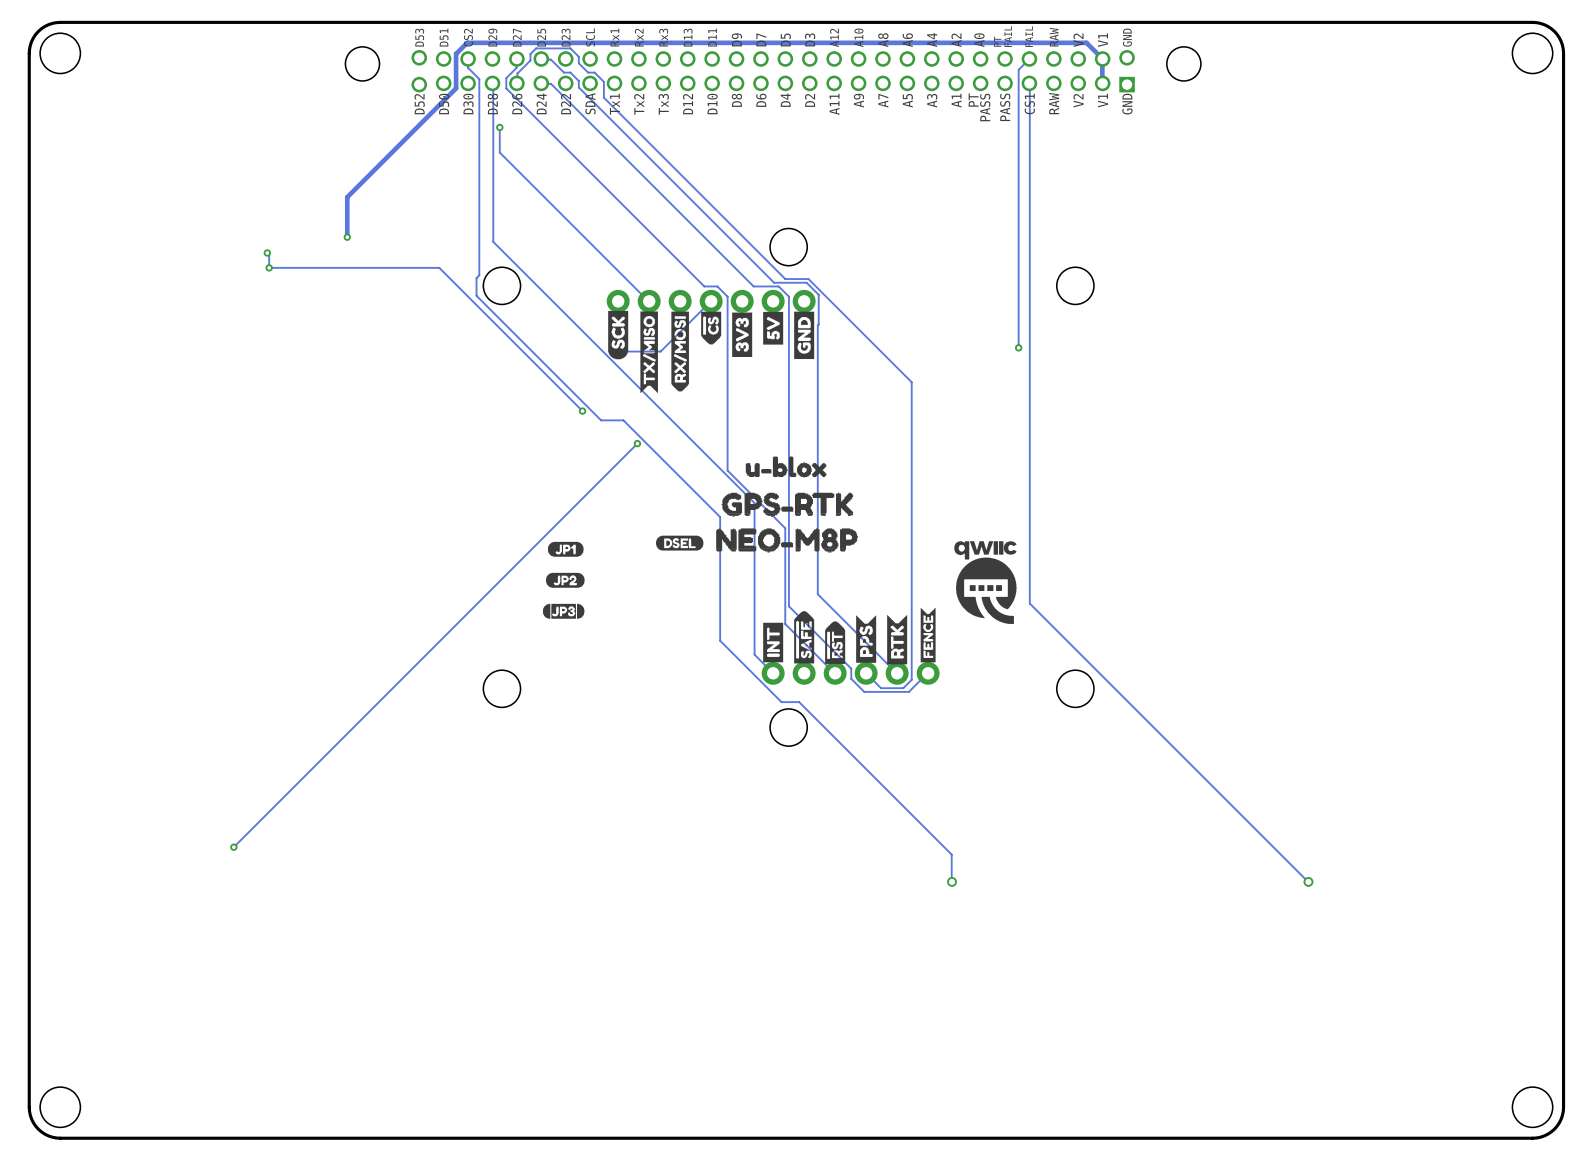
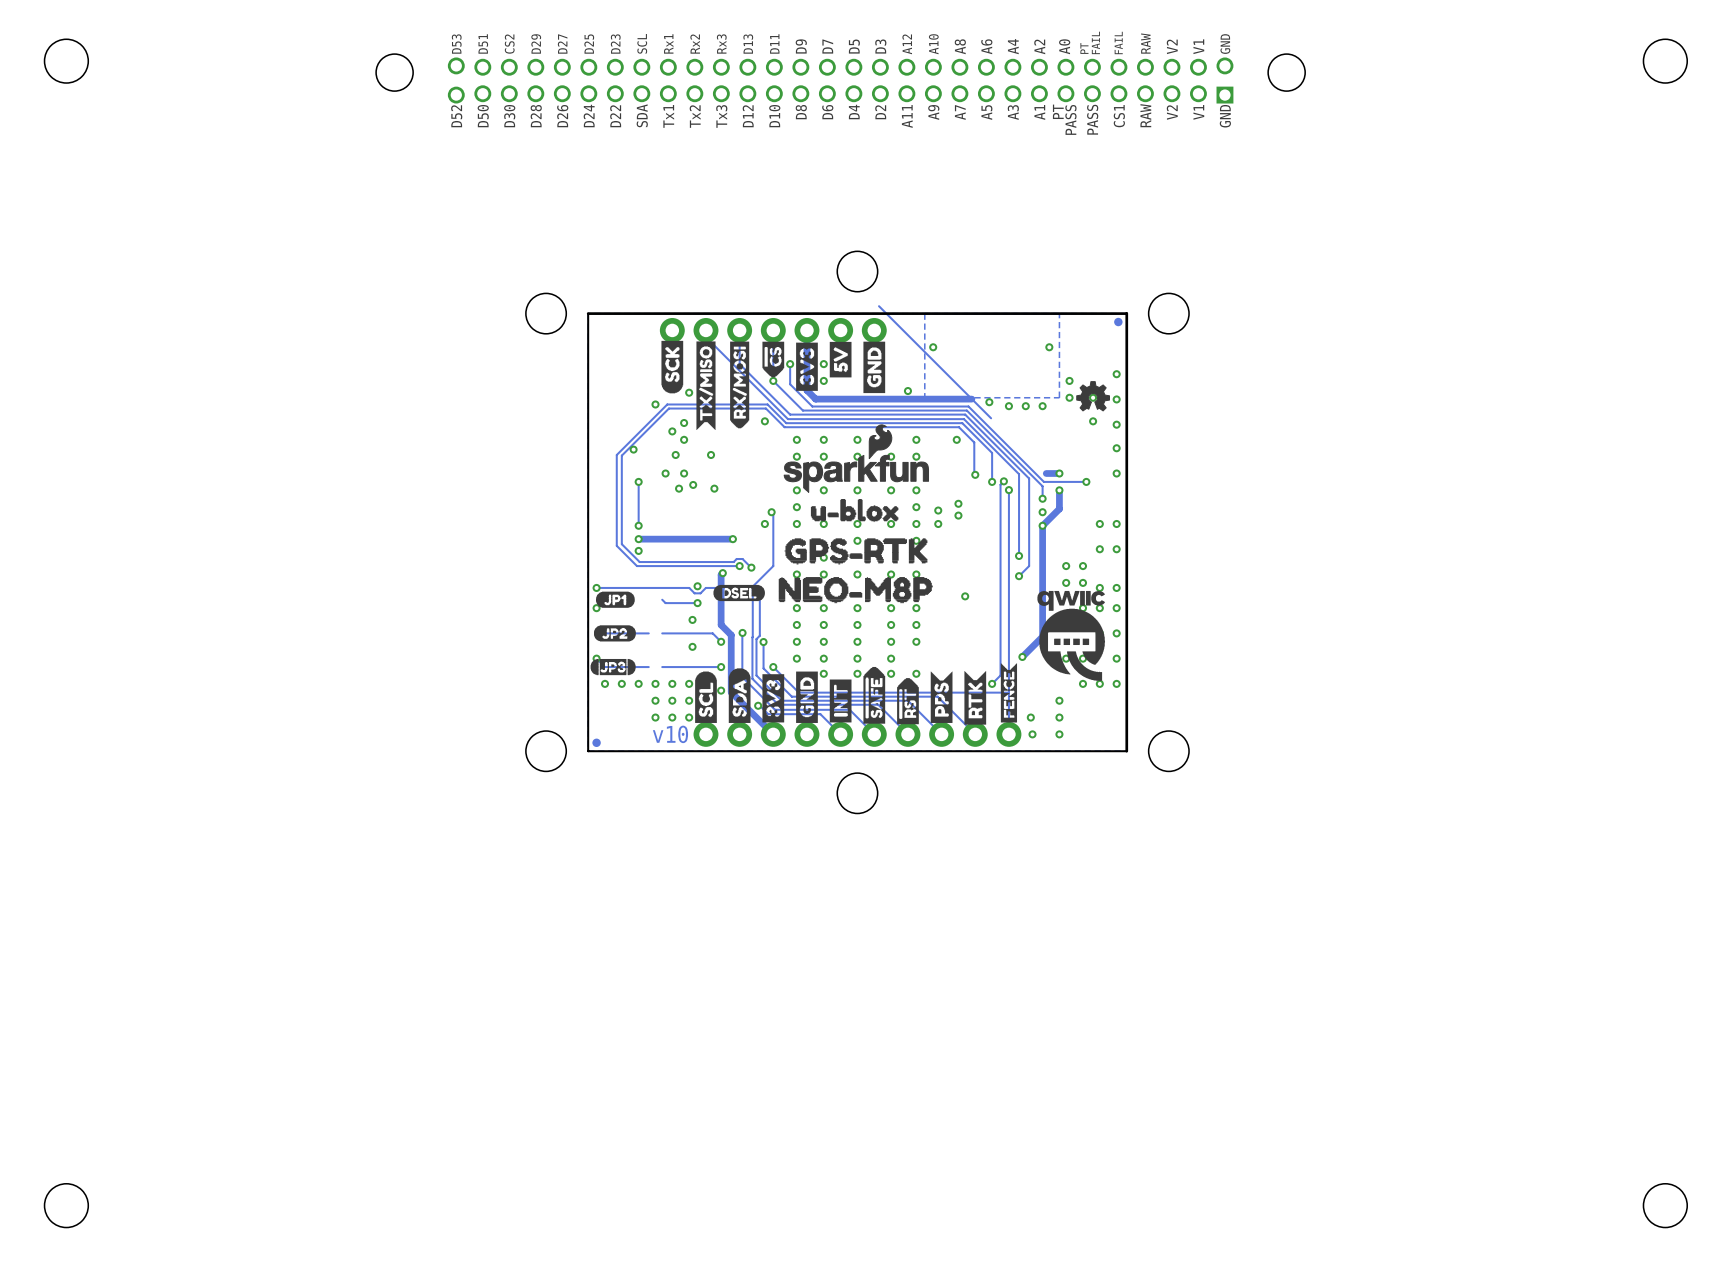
board edge: (1532, 22) (60, 22) (52, 23) (41, 28) (31, 41) (29, 53) (29, 1107) (30, 1115) (35, 1126) (48, 1135) (60, 1138) (1532, 1138) (1540, 1137) (1551, 1131) (1561, 1119) (1563, 1107) (1563, 53) (1561, 41) (1554, 31) (1544, 24) (1532, 22) -> none
track: (468, 58) (468, 67) (479, 79) (479, 275) (476, 278) (476, 295) (601, 420) (623, 420) (720, 517) (720, 640) (781, 702) (799, 702) (951, 854) (952, 881) -> none
track: (516, 58) (516, 67) (506, 78) (506, 88) (704, 286) (717, 286) (727, 296) (727, 470) (785, 528) (785, 624) (835, 673) -> (771, 512) (773, 513) (773, 566) (752, 586) (752, 678) (778, 704) (878, 704) (907, 734)
track: (541, 58) (550, 59) (563, 72) (570, 72) (578, 80) (578, 87) (774, 282) (806, 282) (818, 294) (817, 594) (897, 673) -> (763, 642) (763, 668) (791, 696) (937, 696) (975, 734)
track: (1029, 58) (1018, 69) (1018, 347) -> none
track: (492, 83) (493, 241) (754, 503) (754, 654) -> (758, 705) (768, 714) (820, 714)
track: (516, 83) (517, 73) (530, 60) (530, 54) (536, 48) (570, 48) (578, 56) (578, 63) (588, 72) (594, 72) (603, 81) (603, 97) (785, 279) (808, 279) -> none
track: (541, 83) (550, 83) (753, 286) (778, 286) (788, 296) (788, 606) (851, 668) (851, 678) (864, 691) (908, 691) (928, 673) -> (1008, 490) (1008, 734)
track: (1029, 83) (1029, 603) (1308, 881) -> none
track: (1102, 83) (1102, 58) (1086, 42) (467, 42) (456, 54) (456, 88) (347, 197) (347, 237) -> none
track: (499, 127) (499, 152) (649, 301) -> (1019, 555) (1019, 474) (964, 419) (787, 419) (705, 337) (705, 330)
via: (499, 127) -> none
via: (347, 237) -> none
track: (267, 252) (269, 254) (269, 267) (439, 267) (582, 411) -> none
via: (267, 252) -> none
via: (269, 267) -> none
zone outline: none -> (1059, 313) (1059, 397) (924, 397) (924, 313)
board edge: none -> (1126, 313) (1126, 751) (588, 751) (588, 313) (1126, 313)
part: none -> (1118, 322)
track: none -> (739, 330) (739, 364) (790, 414) (965, 414) (1029, 478) (1029, 566) (1019, 576)
track: (711, 301) (660, 351) (612, 351) -> (773, 330) (773, 380) (802, 410) (966, 410) (1042, 486) (1042, 498)
track: none -> (806, 330) (806, 390) (815, 399) (971, 399)
via: none -> (933, 347)
via: none -> (1049, 347)
track: none -> (790, 364) (790, 384) (812, 406) (968, 406) (1043, 481) (1086, 481)
via: none -> (790, 364)
via: none -> (823, 364)
via: none -> (1116, 374)
via: none -> (773, 380)
via: none -> (823, 380)
via: none -> (1069, 380)
via: (1018, 347) -> none
drawing: none -> [1076, 381, 1110, 412]
via: none -> (907, 391)
via: none -> (689, 392)
via: none -> (1069, 397)
via: none -> (1093, 397)
via: none -> (1116, 399)
via: none -> (989, 402)
via: none -> (655, 404)
via: none -> (1008, 406)
via: none -> (1025, 406)
via: none -> (1042, 406)
track: (911, 382) (911, 679) (903, 688) (881, 688) (866, 673) -> (759, 596) (759, 635) (756, 639) (756, 675) (781, 700) (907, 700) (941, 734)
via: none -> (764, 421)
via: none -> (1093, 421)
via: none -> (684, 423)
drawing: none -> [783, 424, 930, 493]
via: none -> (1116, 424)
via: none -> (672, 431)
via: none -> (684, 439)
via: none -> (796, 439)
via: none -> (823, 439)
via: none -> (857, 439)
via: none -> (916, 439)
via: none -> (956, 439)
via: none -> (1116, 448)
via: none -> (675, 454)
via: none -> (711, 454)
via: none -> (796, 456)
via: none -> (823, 456)
via: none -> (857, 456)
via: none -> (891, 456)
via: none -> (916, 456)
via: none -> (665, 473)
via: none -> (684, 473)
track: none -> (1059, 473) (1046, 473)
via: none -> (1059, 473)
via: none -> (1116, 473)
track: none -> (975, 474) (974, 442) (958, 427) (784, 427) (765, 408) (668, 408) (621, 455) (621, 544) (639, 562) (733, 562) (736, 559) (742, 559) (751, 567)
via: none -> (975, 474)
track: none -> (638, 481) (638, 525)
via: none -> (638, 481)
track: none -> (992, 481) (992, 452) (962, 423) (786, 423) (767, 404) (667, 404) (616, 454) (616, 545) (636, 566) (739, 566)
via: none -> (992, 481)
track: none -> (1003, 481) (1000, 484) (1000, 675) (992, 683)
via: none -> (1003, 481)
via: none -> (1086, 481)
track: (637, 443) (233, 847) -> none
via: none -> (679, 488)
via: none -> (714, 488)
via: none -> (796, 490)
via: none -> (823, 490)
via: none -> (857, 490)
via: none -> (891, 490)
via: none -> (916, 490)
via: none -> (1008, 490)
track: none -> (1059, 490) (1059, 508) (1042, 525) (1042, 636) (1022, 656)
via: none -> (1059, 490)
via: none -> (1042, 498)
via: none -> (958, 503)
via: none -> (796, 507)
via: none -> (916, 507)
via: none -> (938, 510)
via: none -> (771, 512)
via: none -> (1042, 512)
via: none -> (958, 515)
via: none -> (764, 523)
via: none -> (796, 523)
via: none -> (823, 523)
via: none -> (857, 523)
via: none -> (891, 523)
via: none -> (916, 523)
via: none -> (938, 523)
via: none -> (1099, 523)
via: none -> (1116, 523)
via: none -> (638, 525)
via: none -> (1042, 525)
via: none -> (638, 539)
track: none -> (732, 539) (638, 539)
via: none -> (732, 539)
via: none -> (857, 540)
via: none -> (916, 540)
via: none -> (1099, 549)
via: none -> (1116, 549)
via: none -> (638, 550)
via: none -> (1019, 555)
via: none -> (823, 557)
via: none -> (739, 566)
via: none -> (1066, 566)
via: none -> (1083, 566)
via: none -> (751, 567)
track: none -> (722, 573) (721, 574) (721, 624) (731, 635) (731, 692) (773, 734)
via: none -> (722, 573)
via: none -> (796, 574)
via: none -> (823, 574)
via: none -> (857, 574)
via: none -> (891, 574)
via: none -> (916, 574)
via: none -> (1019, 576)
via: none -> (1066, 582)
via: none -> (1083, 582)
via: none -> (697, 586)
via: none -> (596, 587)
track: none -> (721, 587) (705, 587) (700, 593) (694, 593) (689, 587) (596, 587)
via: none -> (1099, 587)
via: none -> (1116, 587)
via: none -> (965, 596)
track: none -> (662, 599) (665, 603) (697, 603)
via: none -> (697, 603)
via: none -> (596, 608)
via: none -> (796, 608)
via: none -> (823, 608)
via: none -> (857, 608)
via: none -> (891, 608)
via: none -> (916, 608)
via: none -> (1083, 608)
via: none -> (1099, 608)
via: none -> (1116, 608)
via: none -> (692, 619)
via: none -> (796, 624)
via: none -> (823, 624)
via: none -> (857, 624)
via: none -> (891, 624)
via: none -> (916, 624)
track: none -> (742, 632) (742, 677) (775, 709) (849, 709) (874, 734)
via: none -> (742, 632)
track: none -> (648, 633) (596, 633)
track: none -> (662, 633) (712, 633) (721, 641)
via: none -> (1116, 633)
via: none -> (721, 641)
via: none -> (763, 642)
via: none -> (796, 641)
via: none -> (823, 641)
via: none -> (857, 641)
via: none -> (891, 641)
via: none -> (916, 641)
via: none -> (692, 646)
via: none -> (1022, 656)
track: none -> (596, 658) (605, 667) (648, 667)
via: none -> (596, 658)
via: none -> (796, 658)
via: none -> (823, 658)
via: none -> (857, 658)
via: none -> (891, 658)
via: none -> (1066, 658)
via: none -> (1083, 658)
via: none -> (1116, 658)
track: none -> (721, 667) (662, 667)
via: none -> (721, 667)
track: none -> (773, 667) (798, 692) (1008, 692)
via: none -> (773, 667)
drawing: none -> [695, 668, 818, 723]
via: none -> (823, 673)
via: none -> (857, 673)
via: none -> (891, 673)
via: none -> (916, 673)
via: none -> (605, 683)
via: none -> (621, 683)
via: none -> (638, 683)
via: none -> (655, 683)
via: none -> (672, 683)
via: none -> (689, 683)
via: none -> (992, 683)
via: none -> (1083, 683)
via: none -> (1099, 683)
via: none -> (1116, 683)
via: none -> (721, 690)
via: none -> (655, 700)
via: none -> (672, 700)
via: none -> (689, 700)
via: none -> (1059, 700)
via: none -> (758, 705)
via: none -> (655, 717)
via: none -> (672, 717)
via: none -> (689, 717)
via: none -> (1030, 717)
via: none -> (1059, 717)
text: none -> v10 (670, 734)
part: none -> (756, 734)
via: none -> (1032, 734)
via: none -> (1059, 734)
part: none -> (596, 742)
via: (233, 847) -> none
part: (952, 881) -> none
part: (1308, 881) -> none

